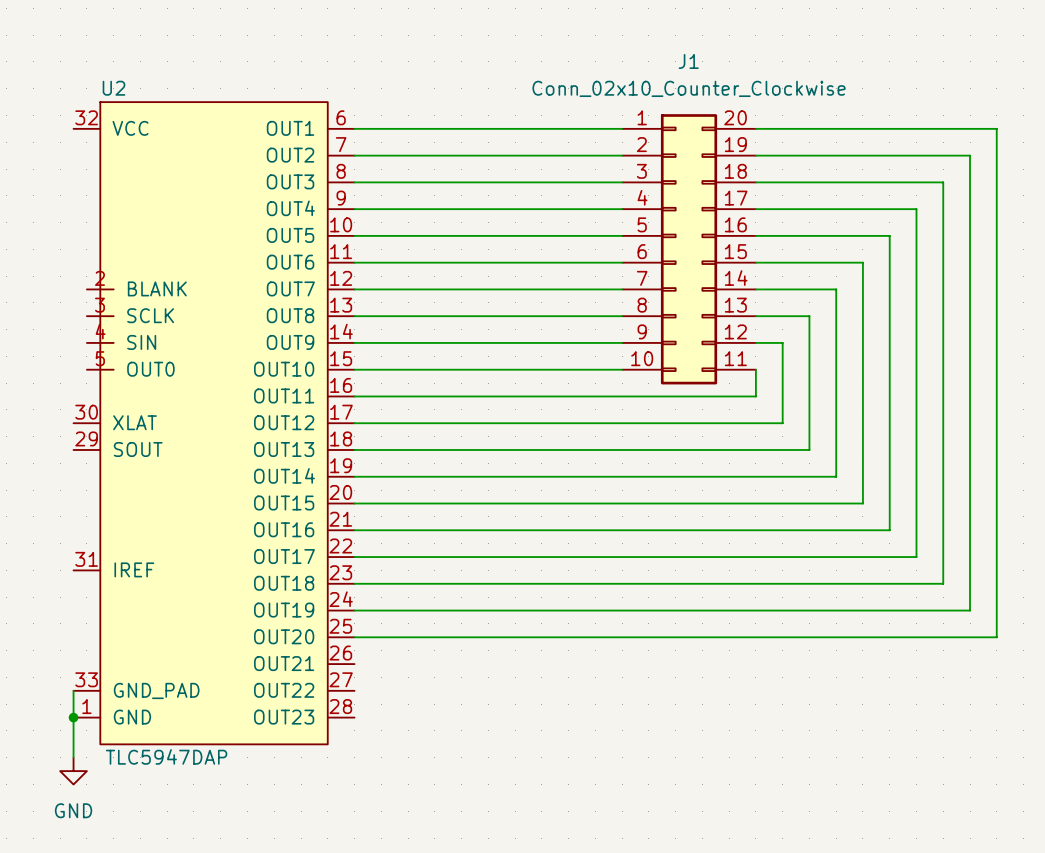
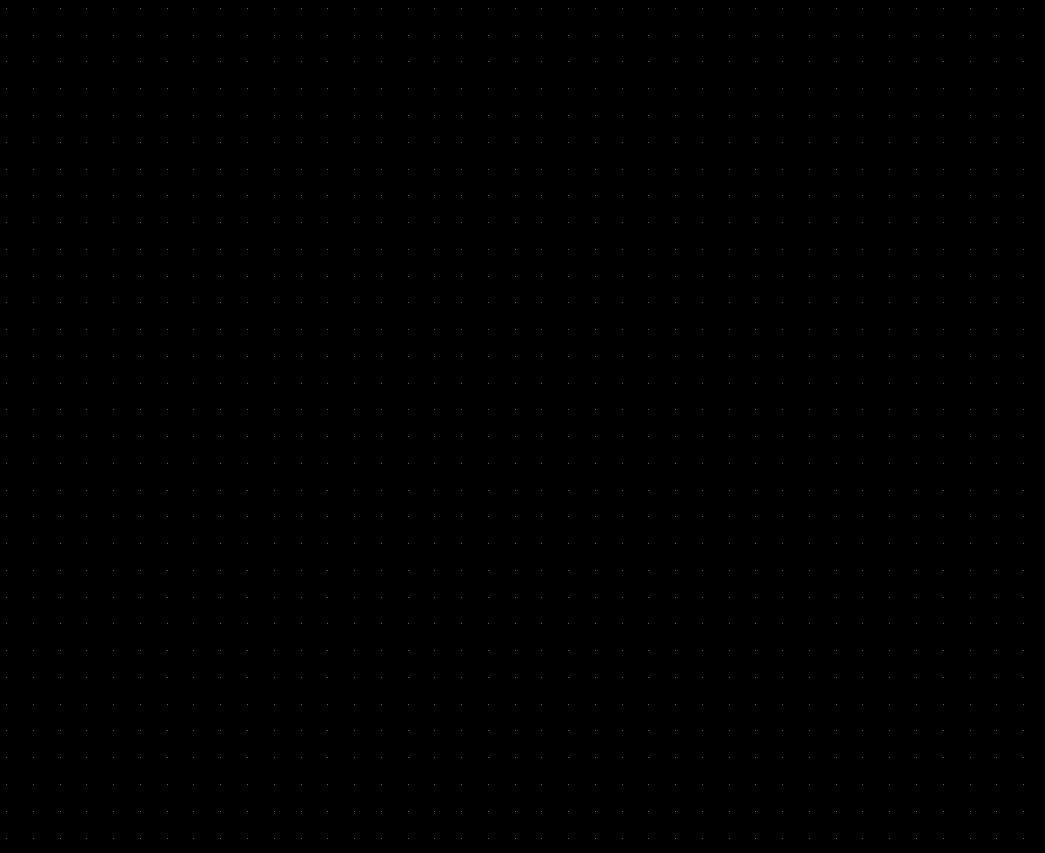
wire: (354, 128) (622, 128) -> none
wire: (755, 128) (996, 128) (996, 637) (354, 637) -> none
wire: (354, 155) (622, 155) -> none
wire: (755, 155) (970, 155) (970, 610) (354, 610) -> none
wire: (354, 182) (622, 182) -> none
wire: (755, 182) (943, 182) (943, 583) (354, 583) -> none
wire: (354, 209) (622, 209) -> none
wire: (755, 209) (916, 209) (916, 557) (354, 557) -> none
wire: (354, 235) (622, 235) -> none
wire: (755, 235) (889, 235) (889, 530) (354, 530) -> none
J1: Conn_02x10_Counter_Clockwise (689, 249) -> none
wire: (354, 262) (622, 262) -> none
wire: (755, 262) (862, 262) (862, 503) (354, 503) -> none
wire: (354, 289) (622, 289) -> none
wire: (755, 289) (836, 289) (836, 476) (354, 476) -> none
wire: (354, 316) (622, 316) -> none
wire: (755, 316) (809, 316) (809, 449) (354, 449) -> none
wire: (354, 342) (622, 342) -> none
wire: (755, 342) (782, 342) (782, 423) (354, 423) -> none
wire: (354, 369) (622, 369) -> none
wire: (755, 369) (755, 396) (354, 396) -> none
U2: (214, 423) -> none
wire: (73, 690) (73, 757) -> none
junction: (73, 717) -> none
power symbol: GND (73, 771) -> none

